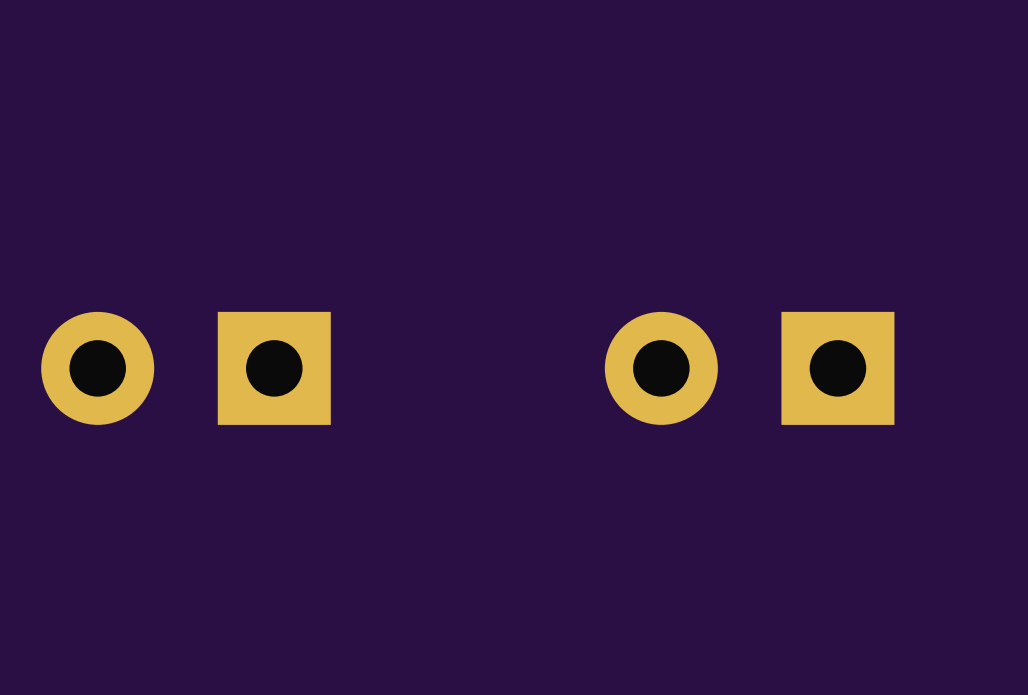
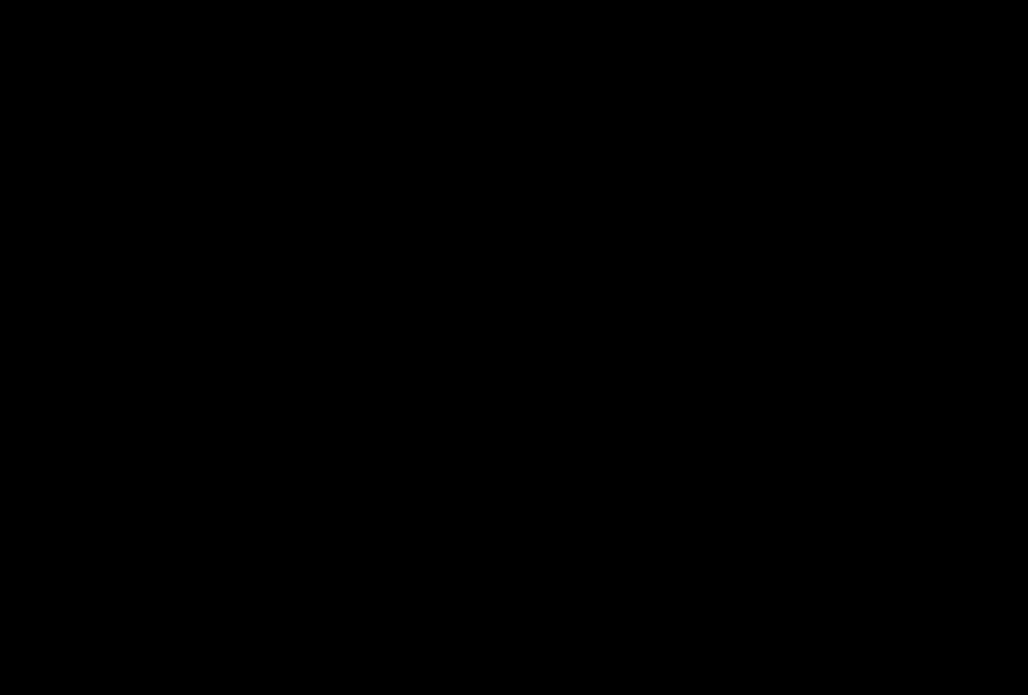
part: (185, 368) -> none
part: (749, 368) -> none

